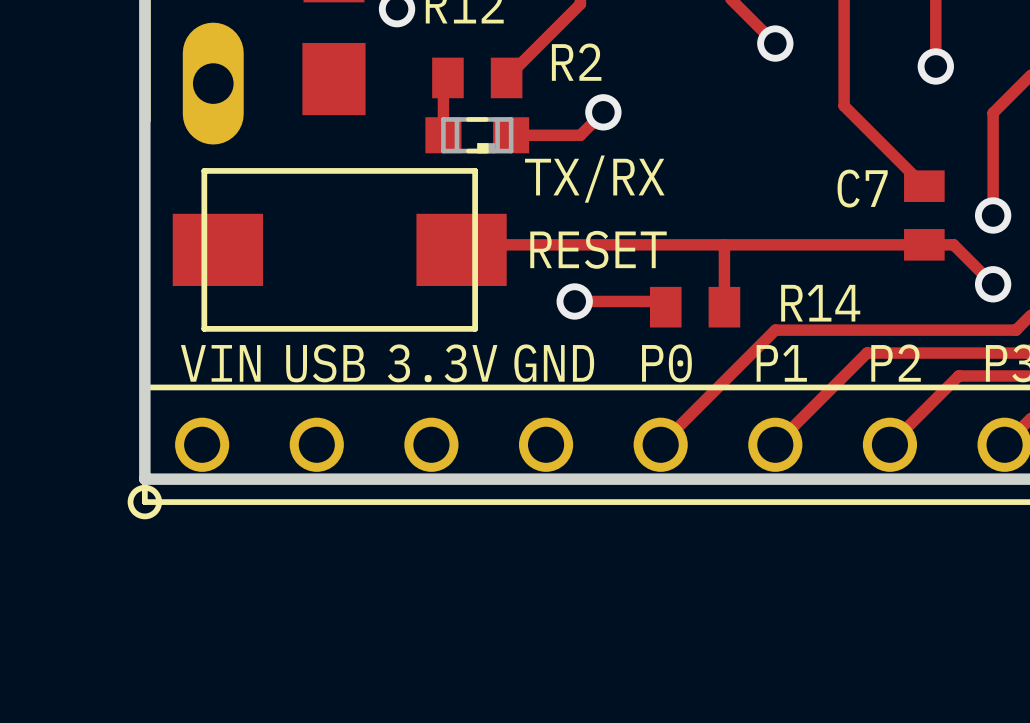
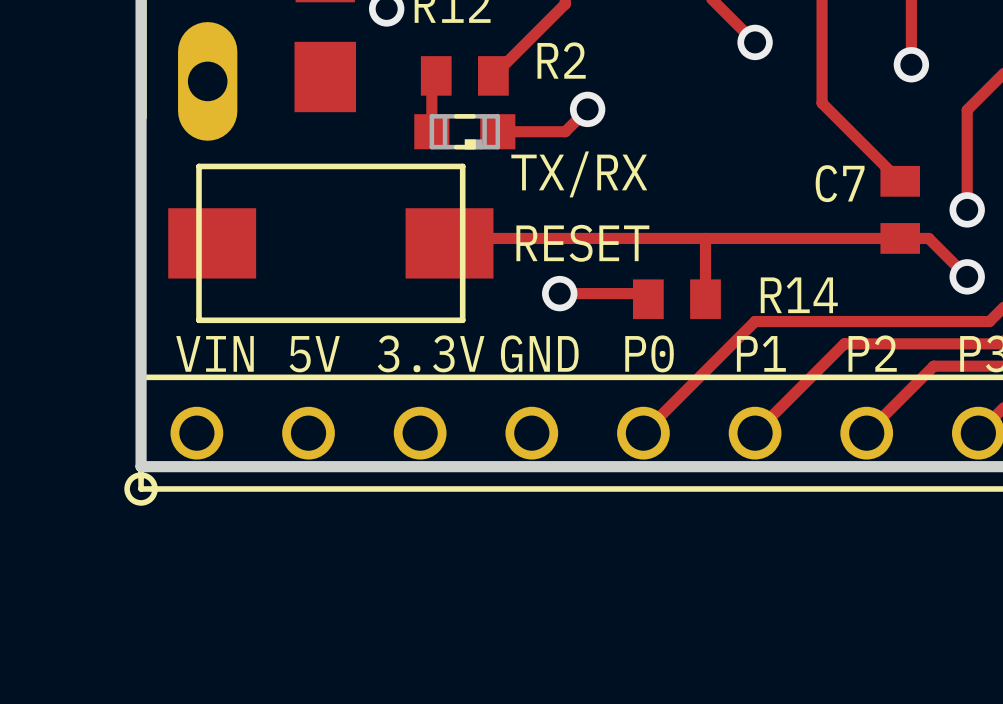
text: USB (325, 363) -> 5V (314, 354)

